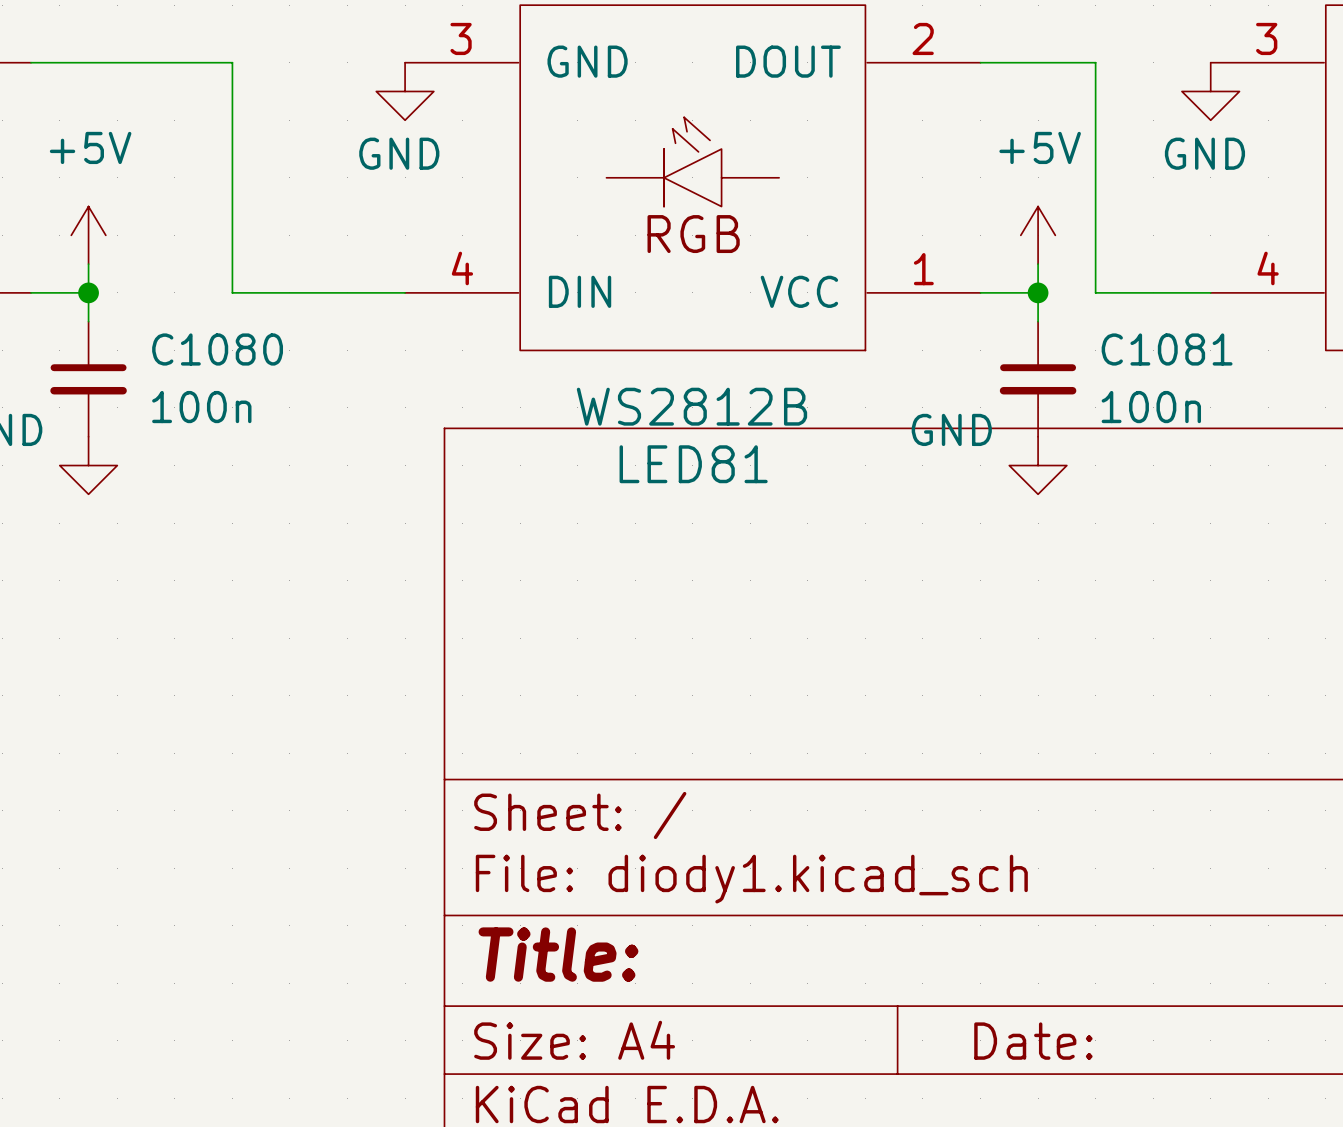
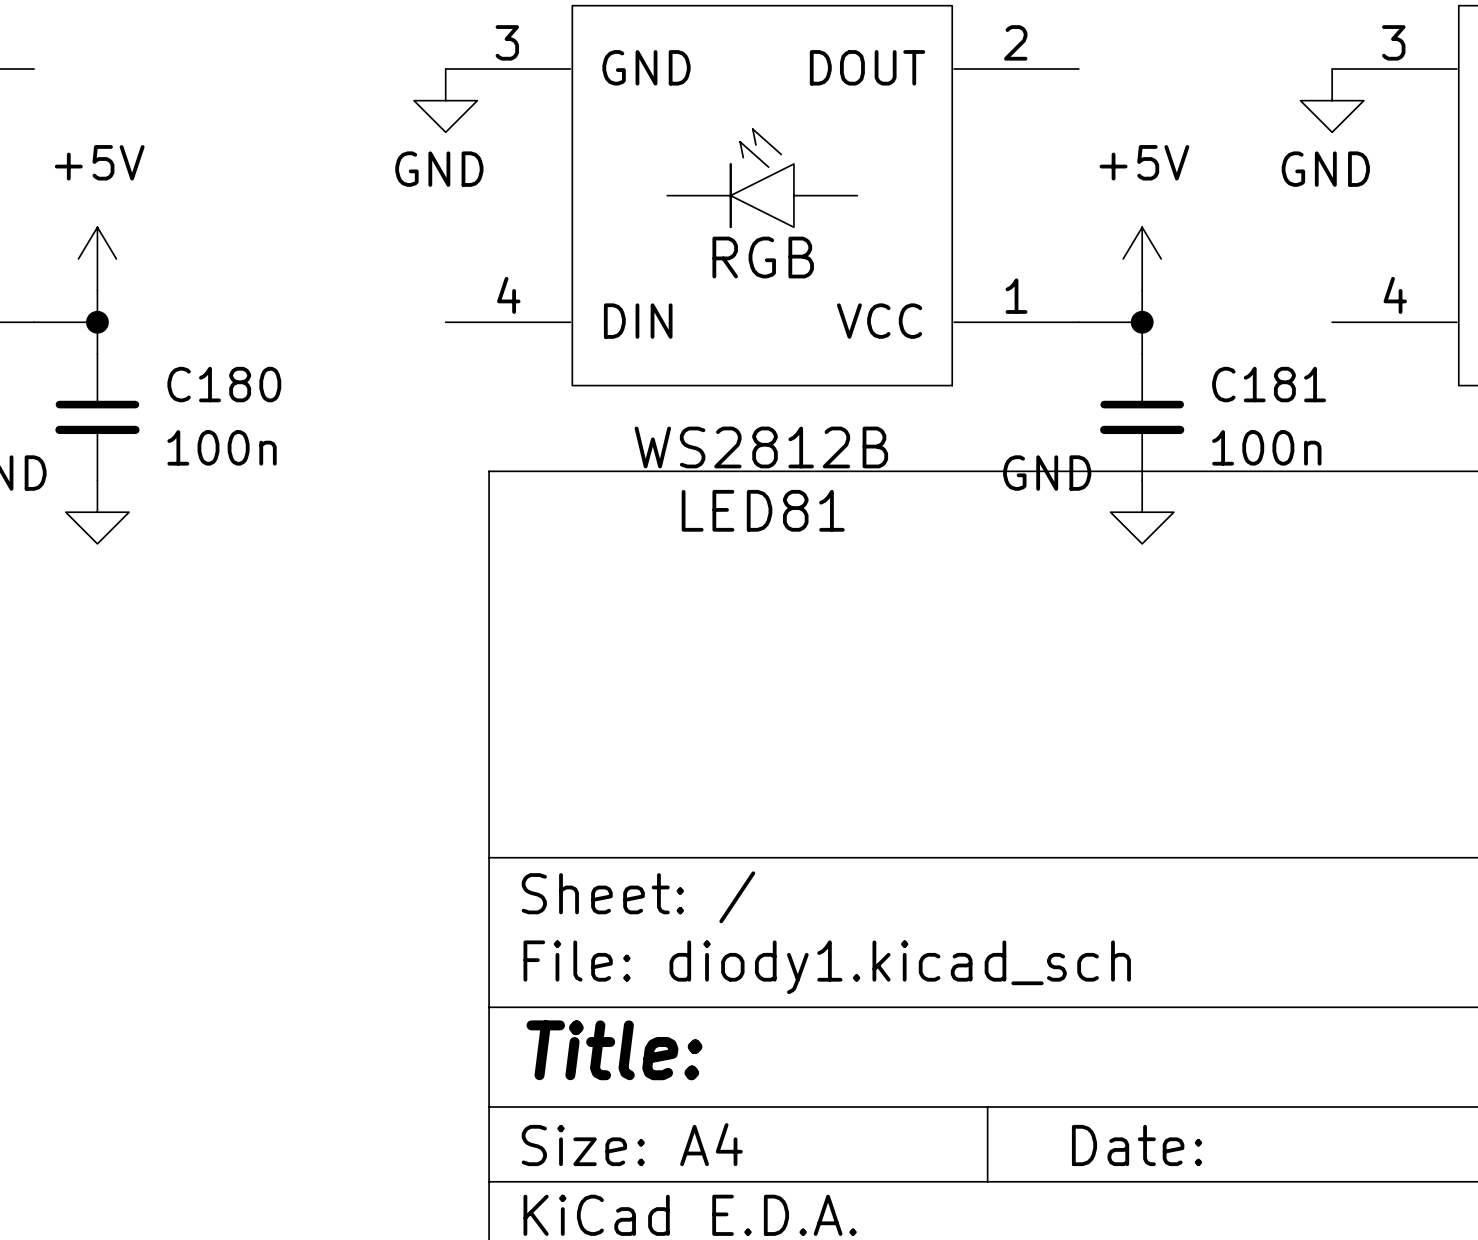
wire: (31, 62) (232, 62) (232, 292) (405, 292) -> none
wire: (980, 62) (1095, 62) (1095, 292) (1210, 292) -> none
C1080 name: C1080 (217, 349) -> C180 (224, 384)
C1081 name: C1081 (1167, 349) -> C181 (1269, 384)

